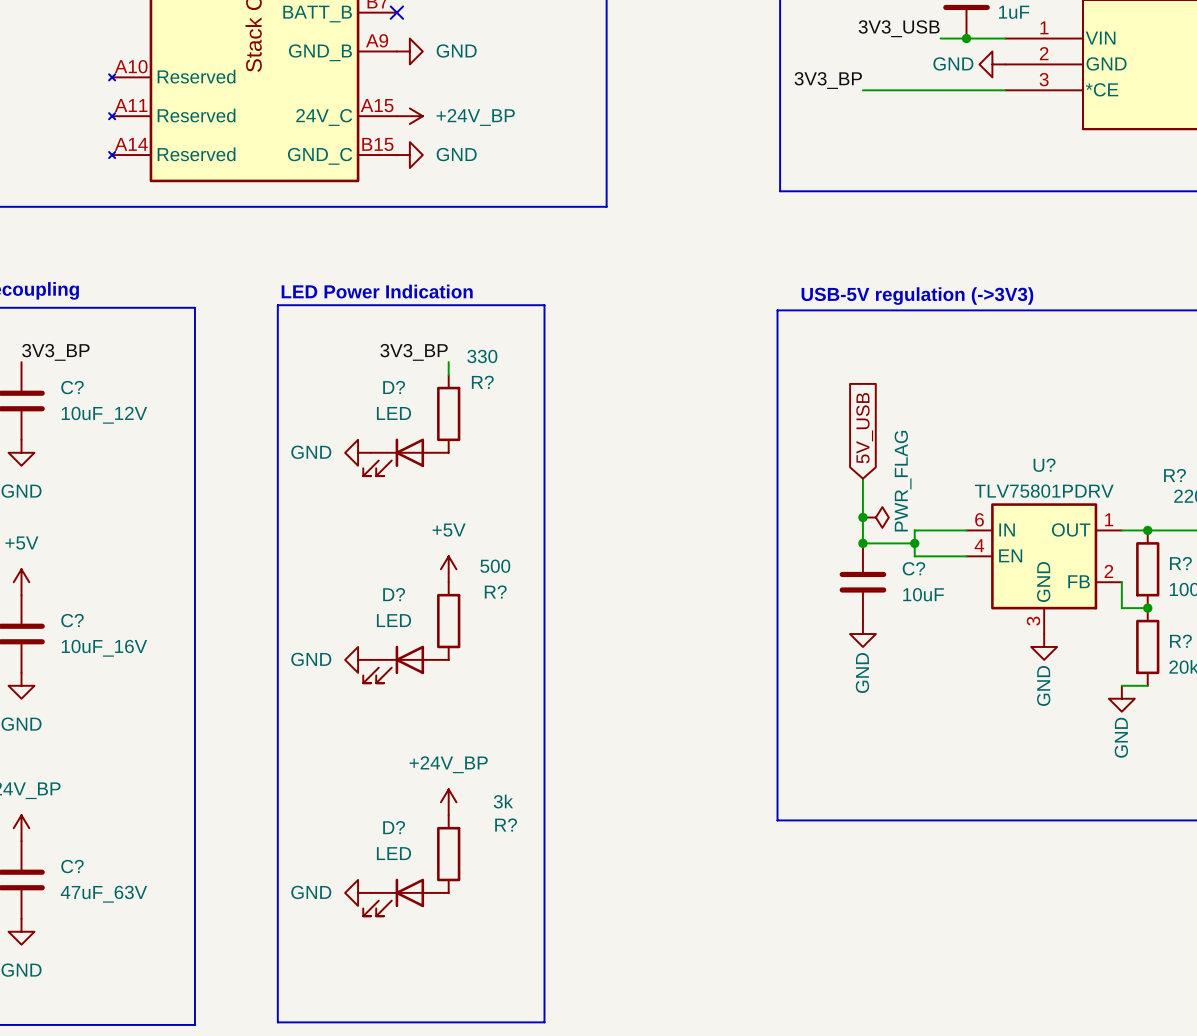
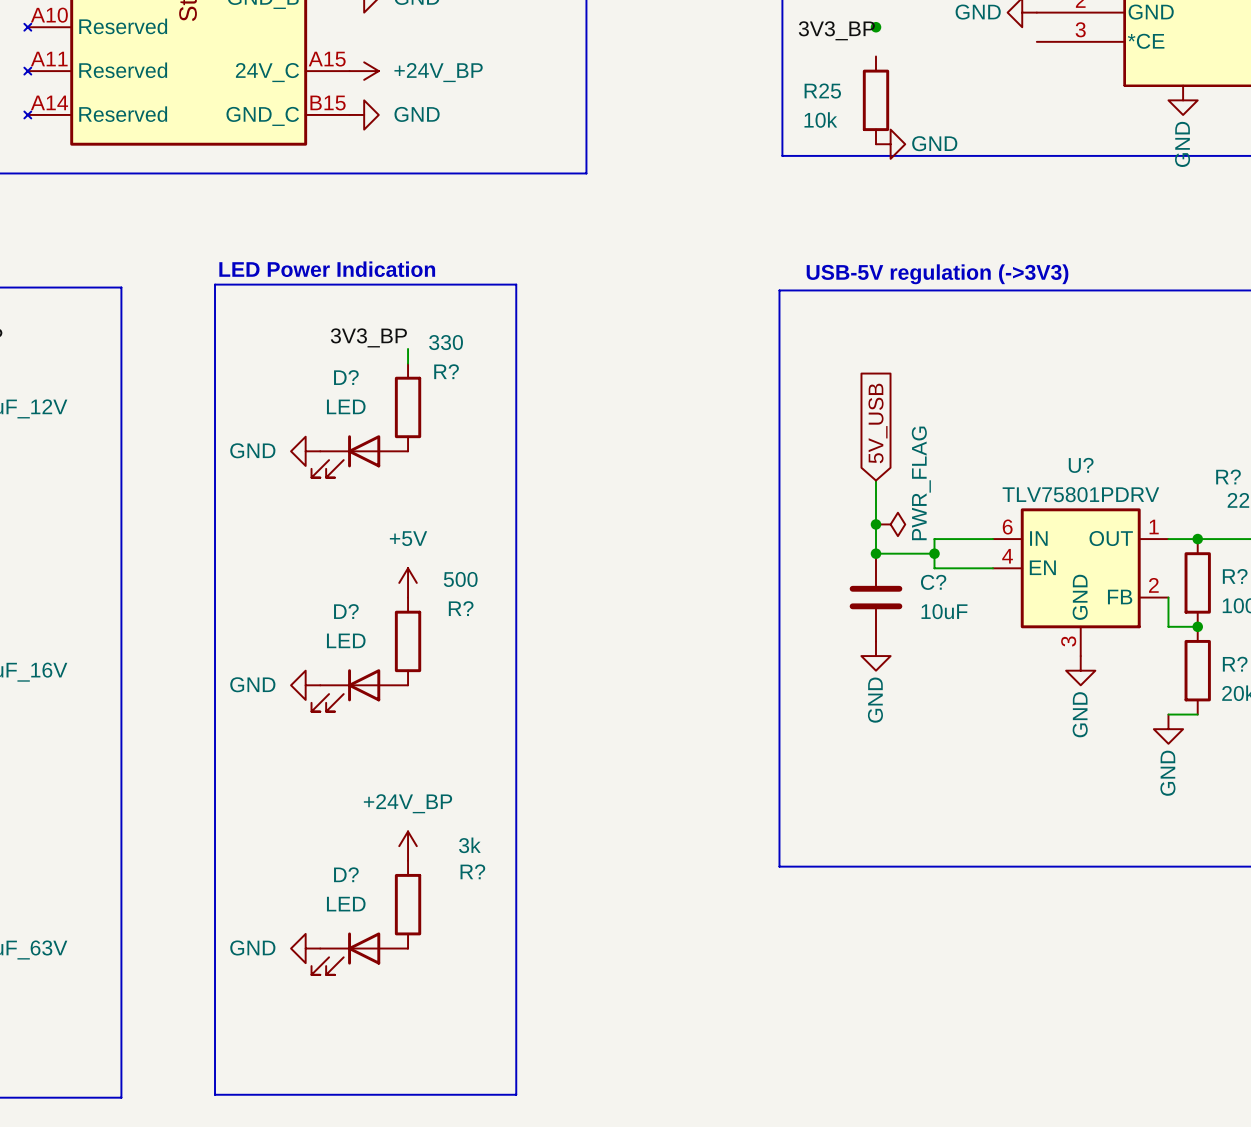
junction: none -> (876, 27)
wire: (862, 90) (1005, 90) -> none
R25: none -> 10k (876, 100)
power symbol: none -> GND (1183, 100)
power symbol: none -> GND (890, 144)

